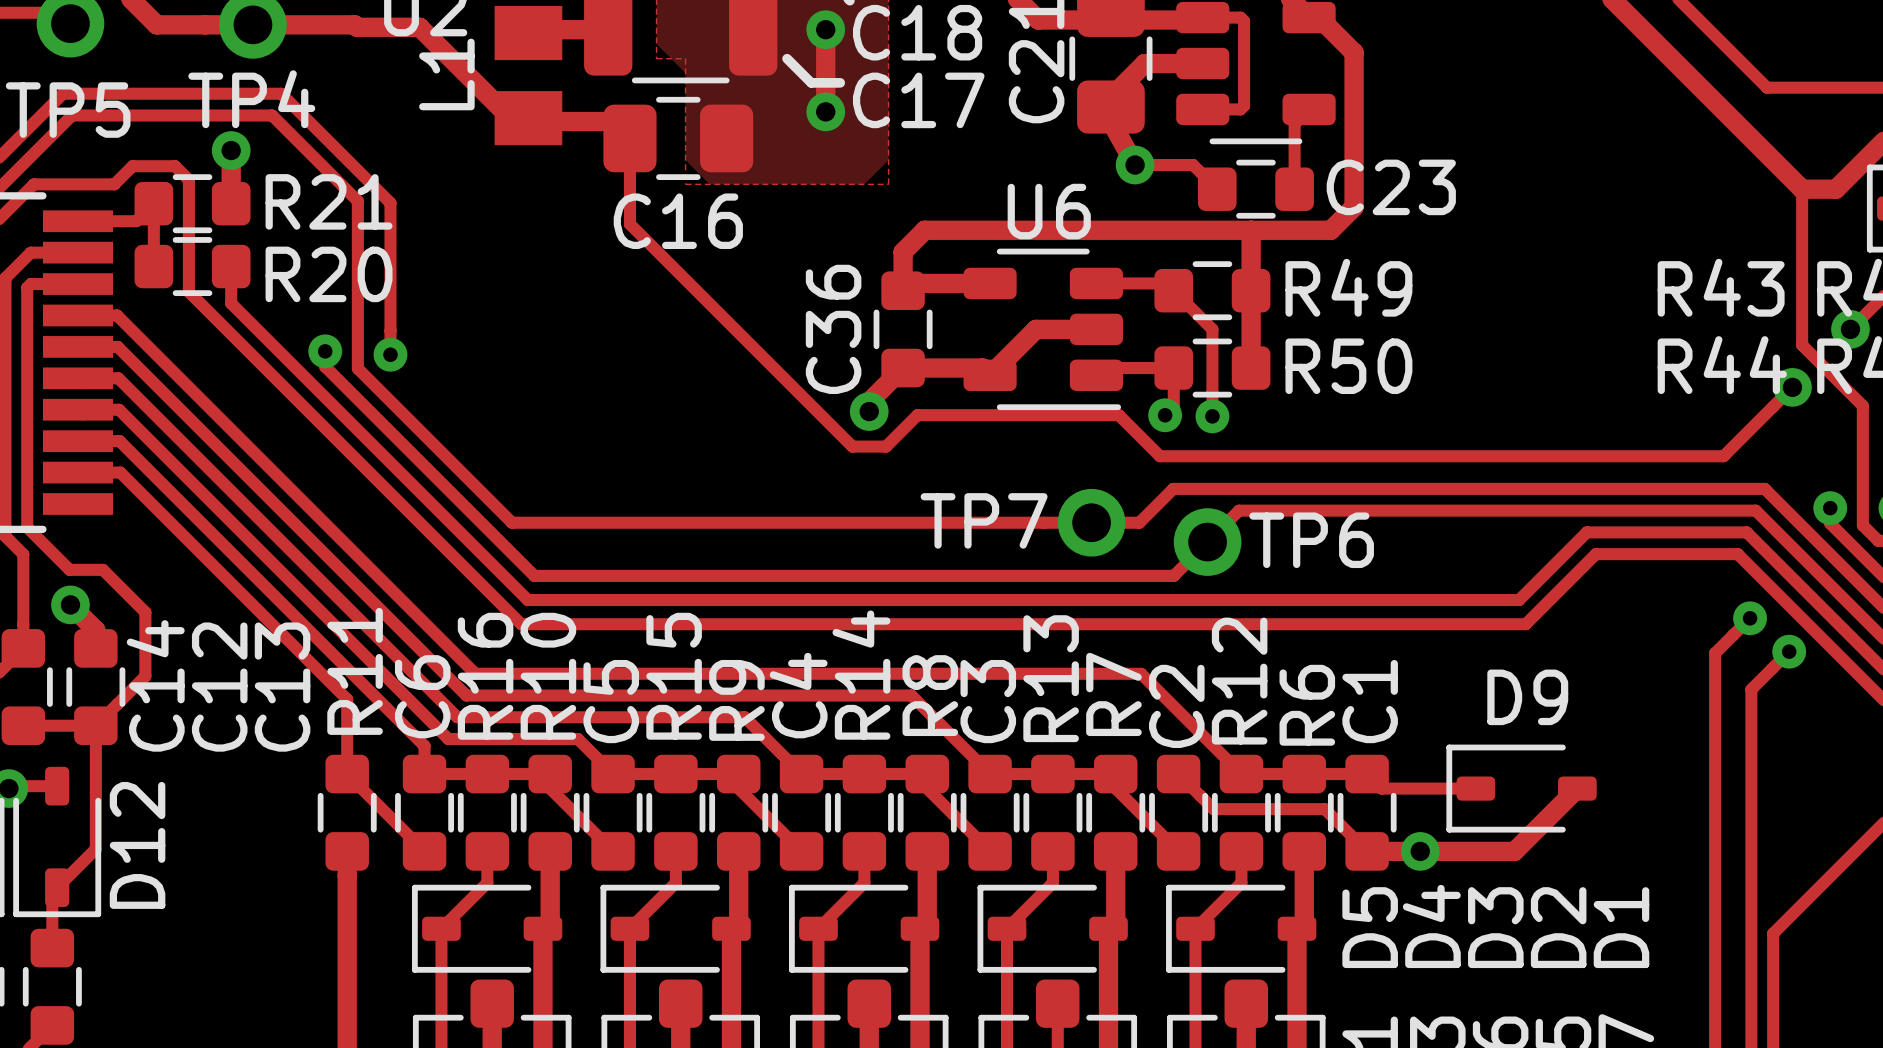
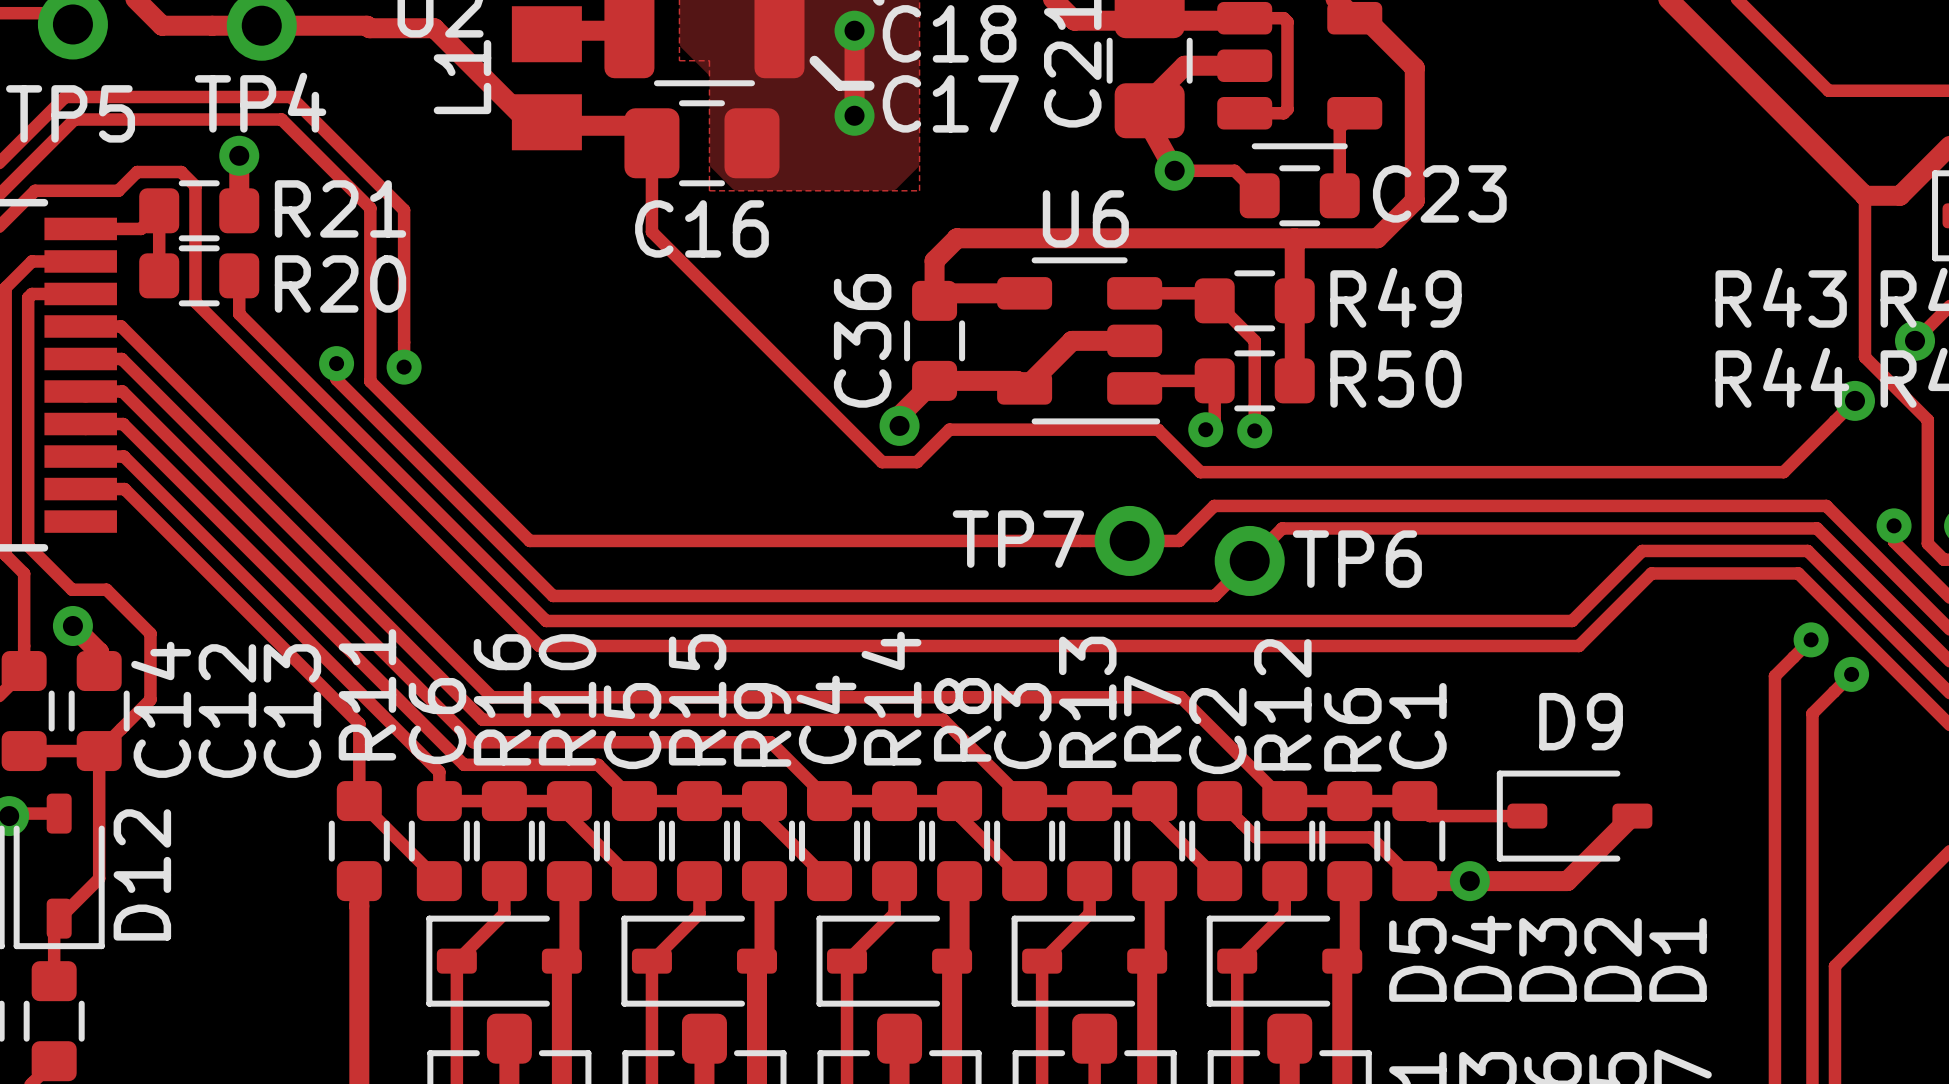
track: (1354, 52) (1354, 207) -> (1401, 54) (1414, 67) (1414, 200) (1401, 214)

